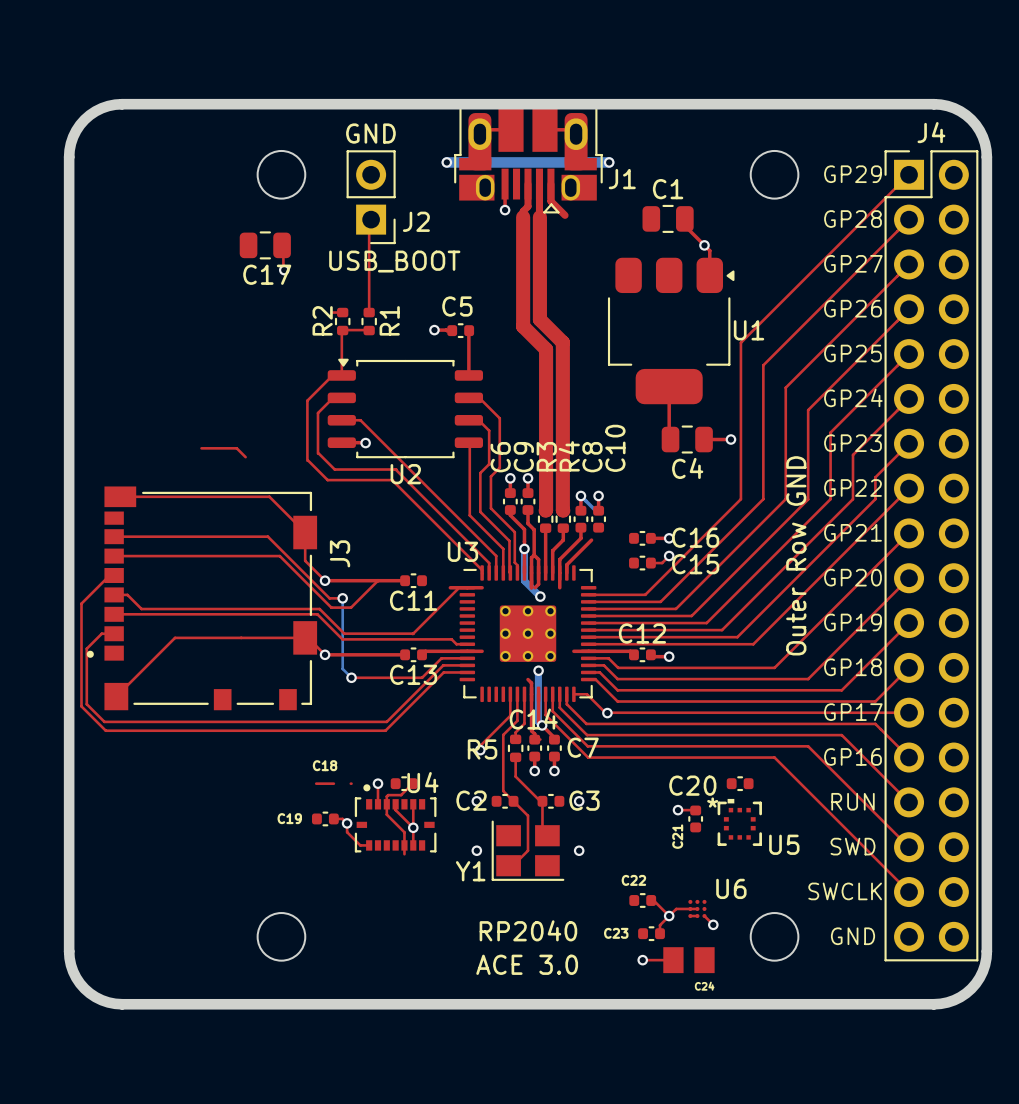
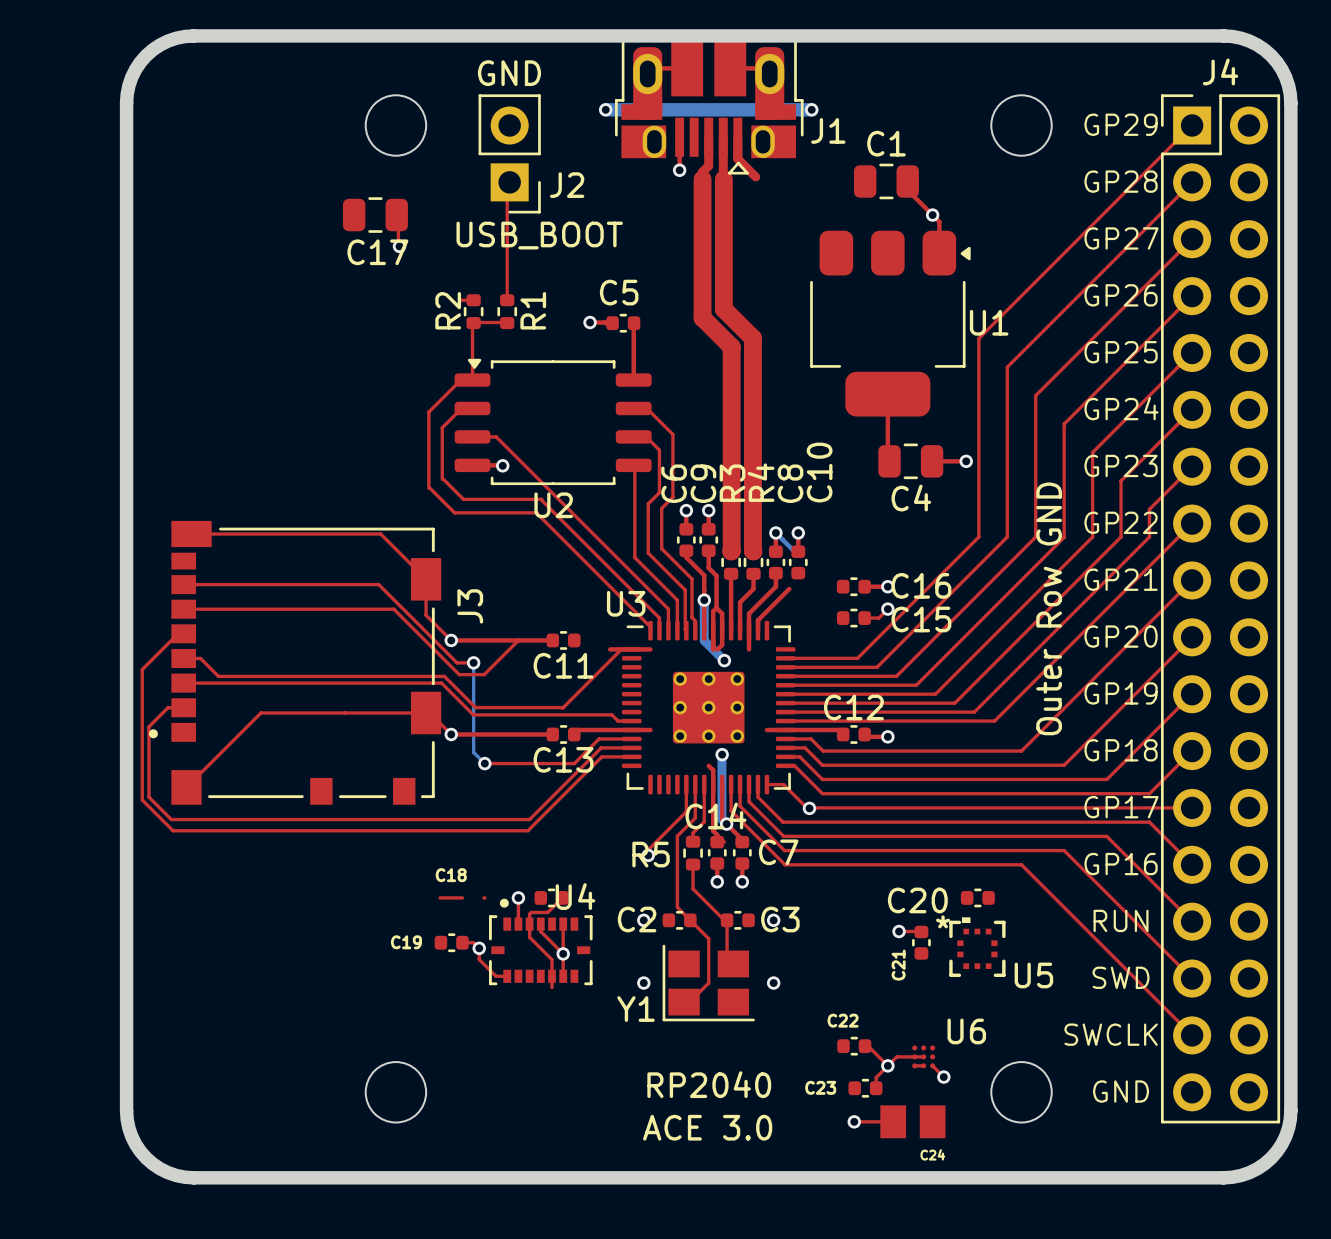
top track: (201, 448) (236, 448) (245, 457) -> none

